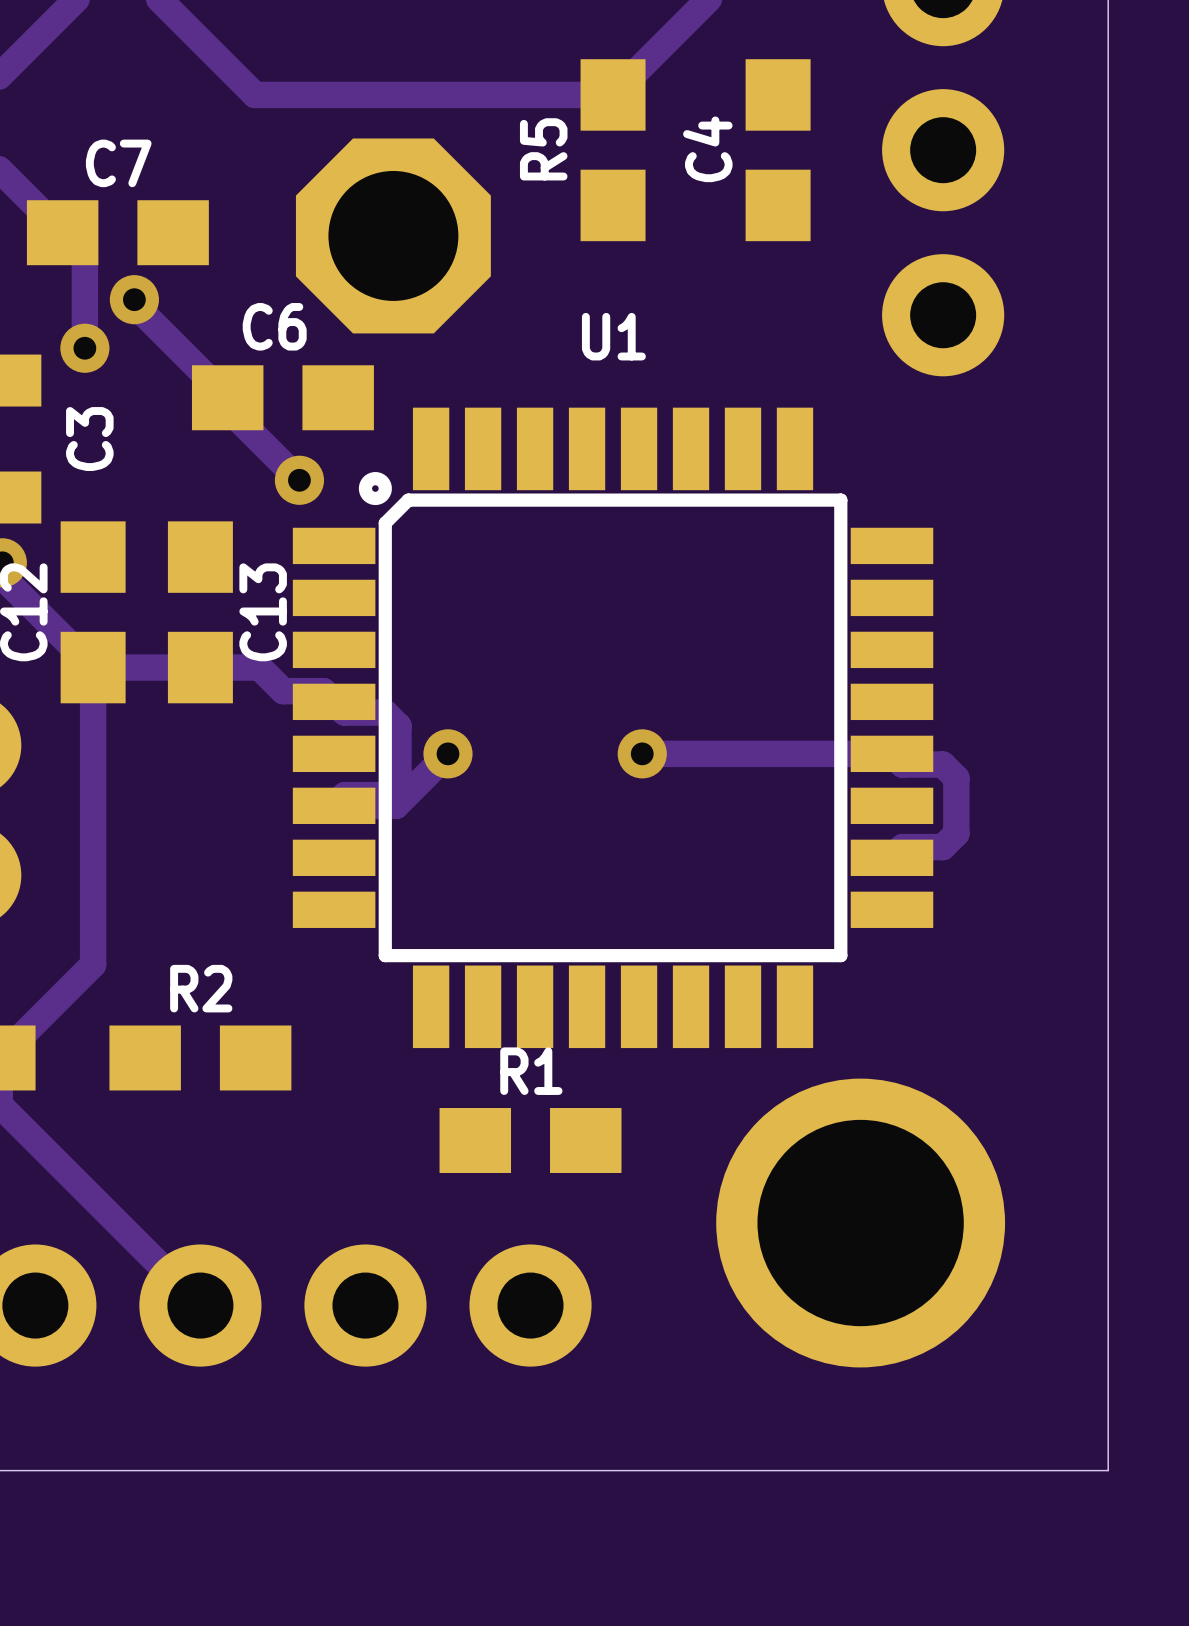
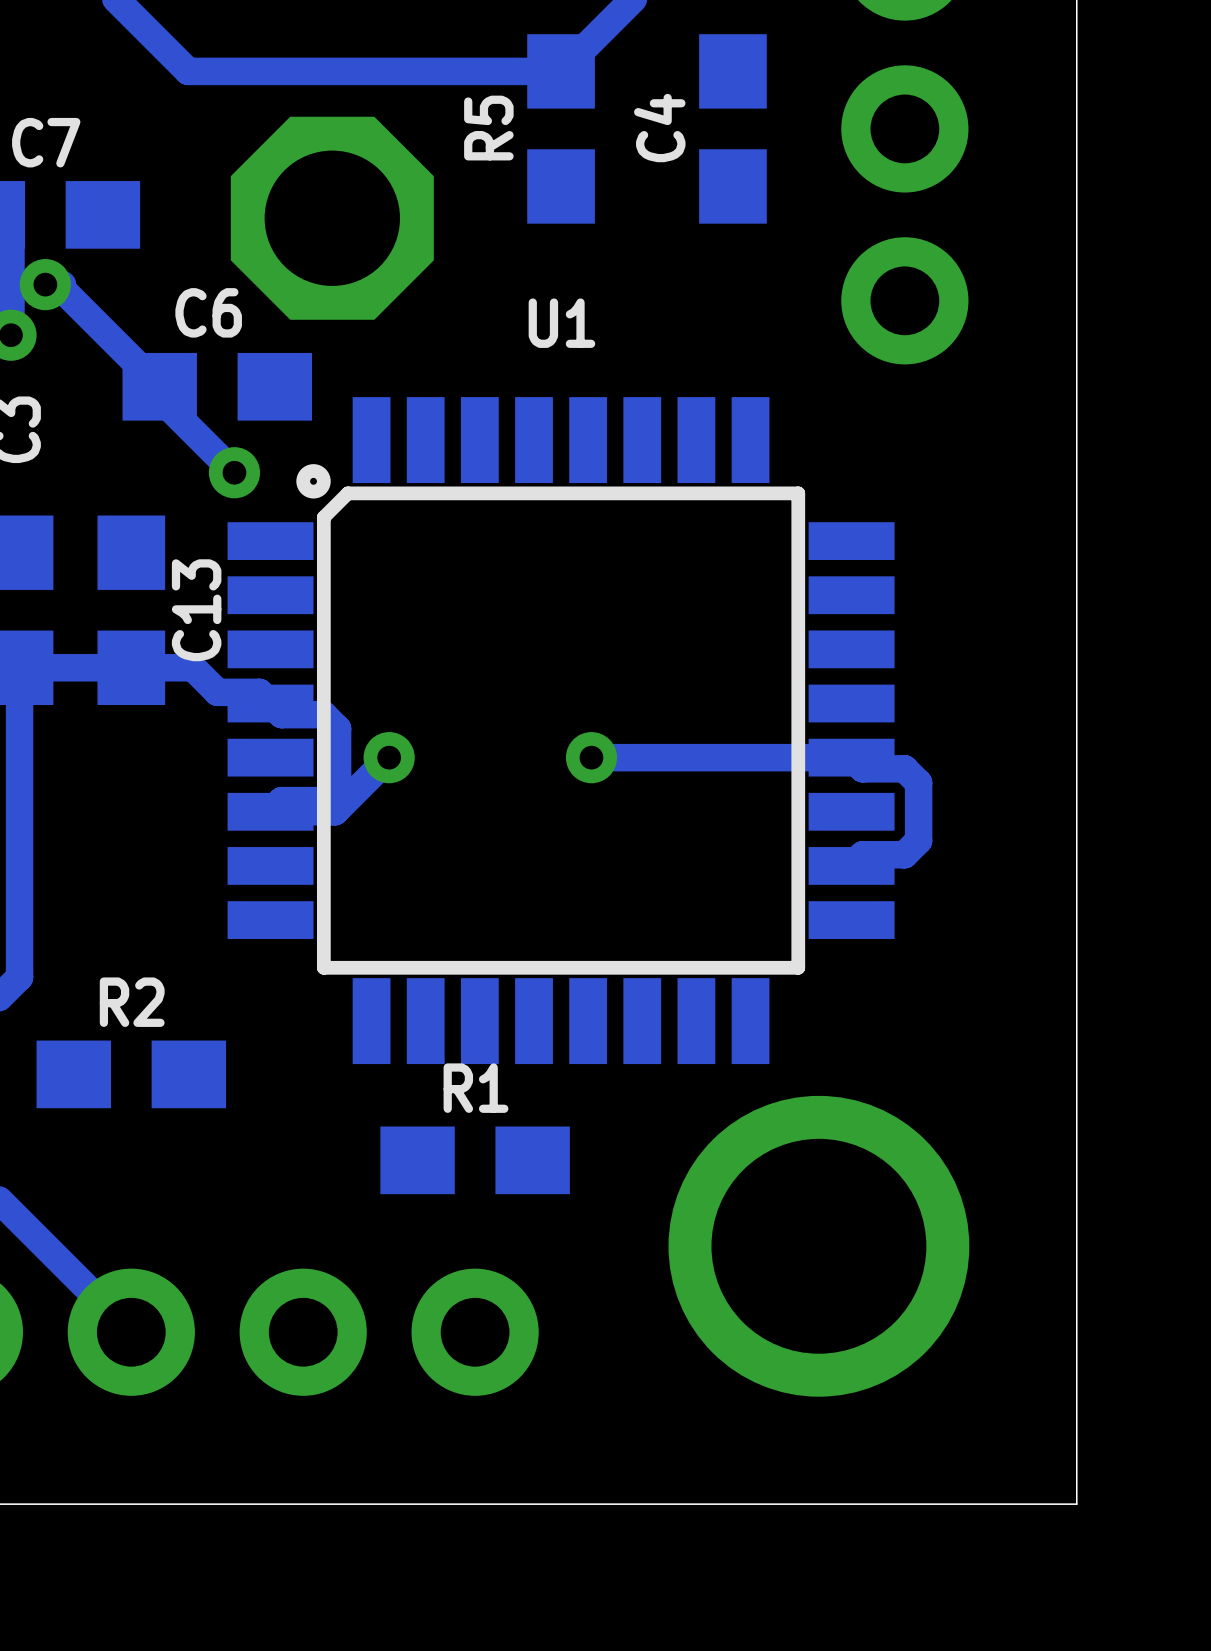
via position: (134, 299) -> (45, 284)

